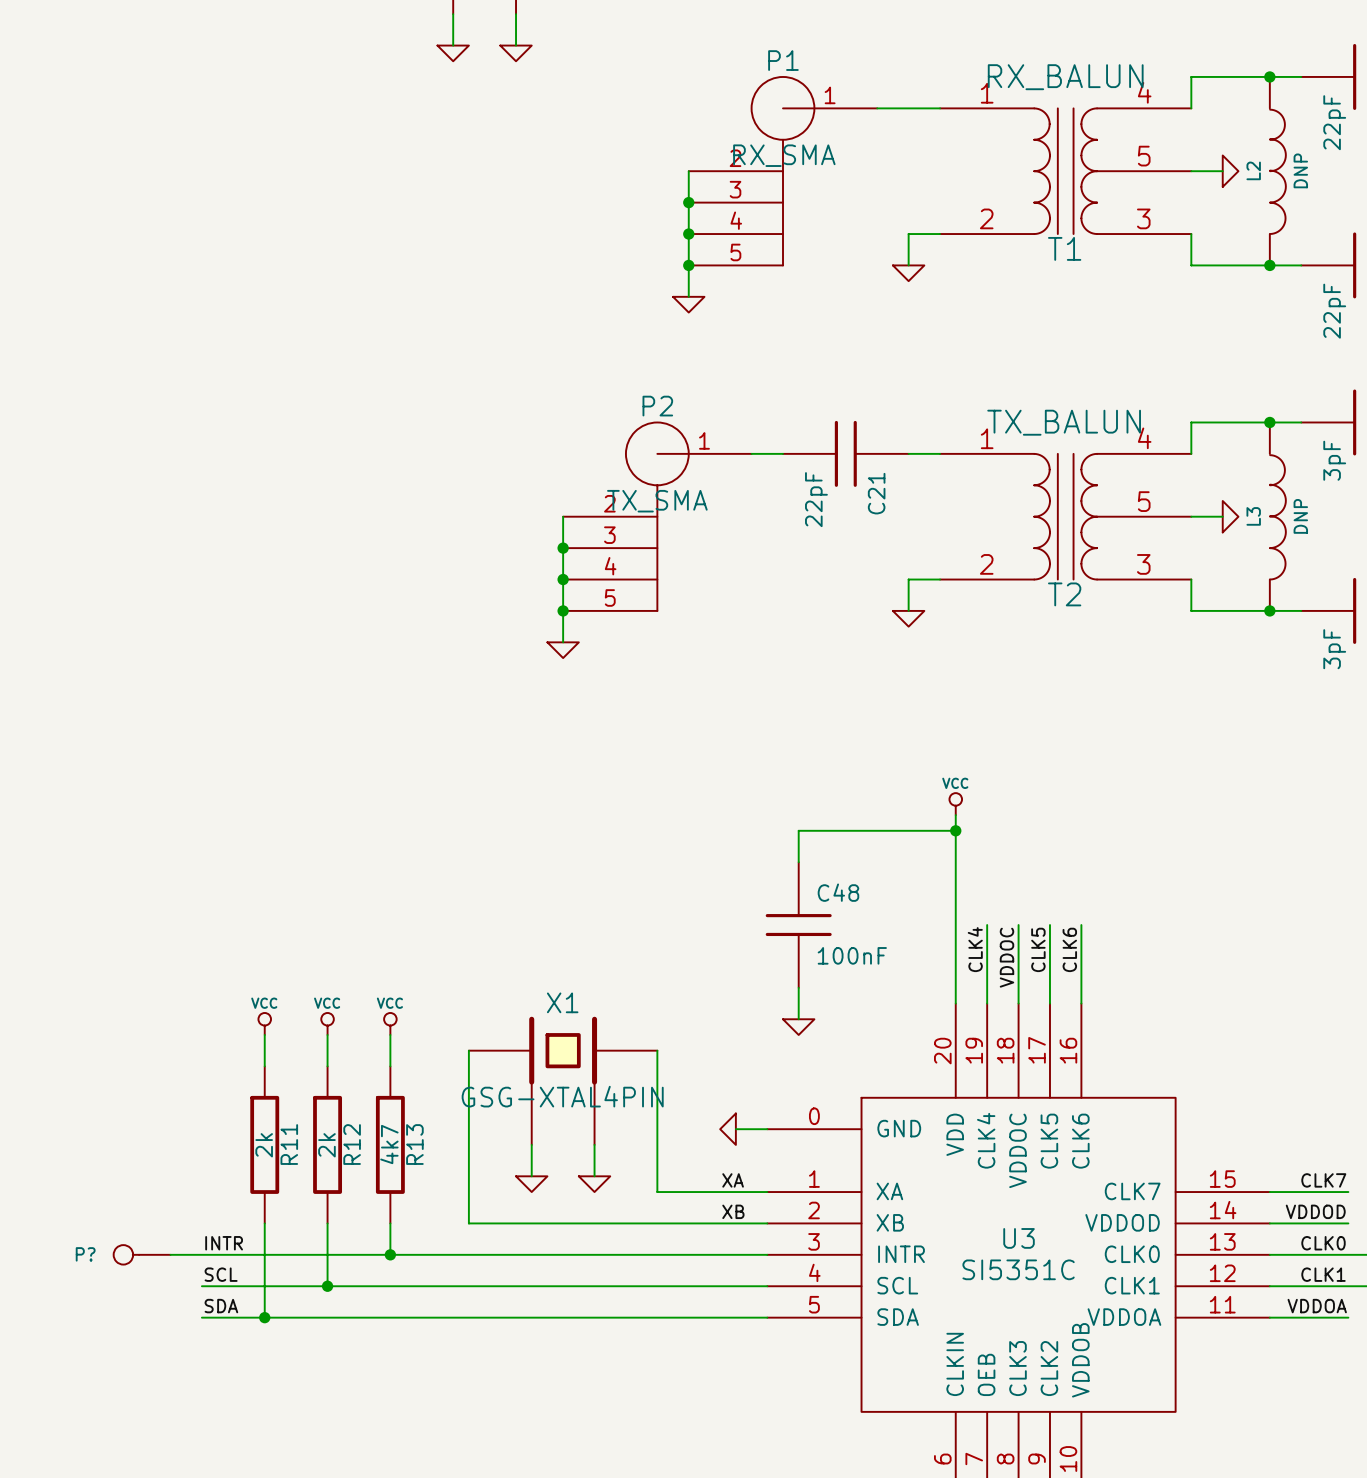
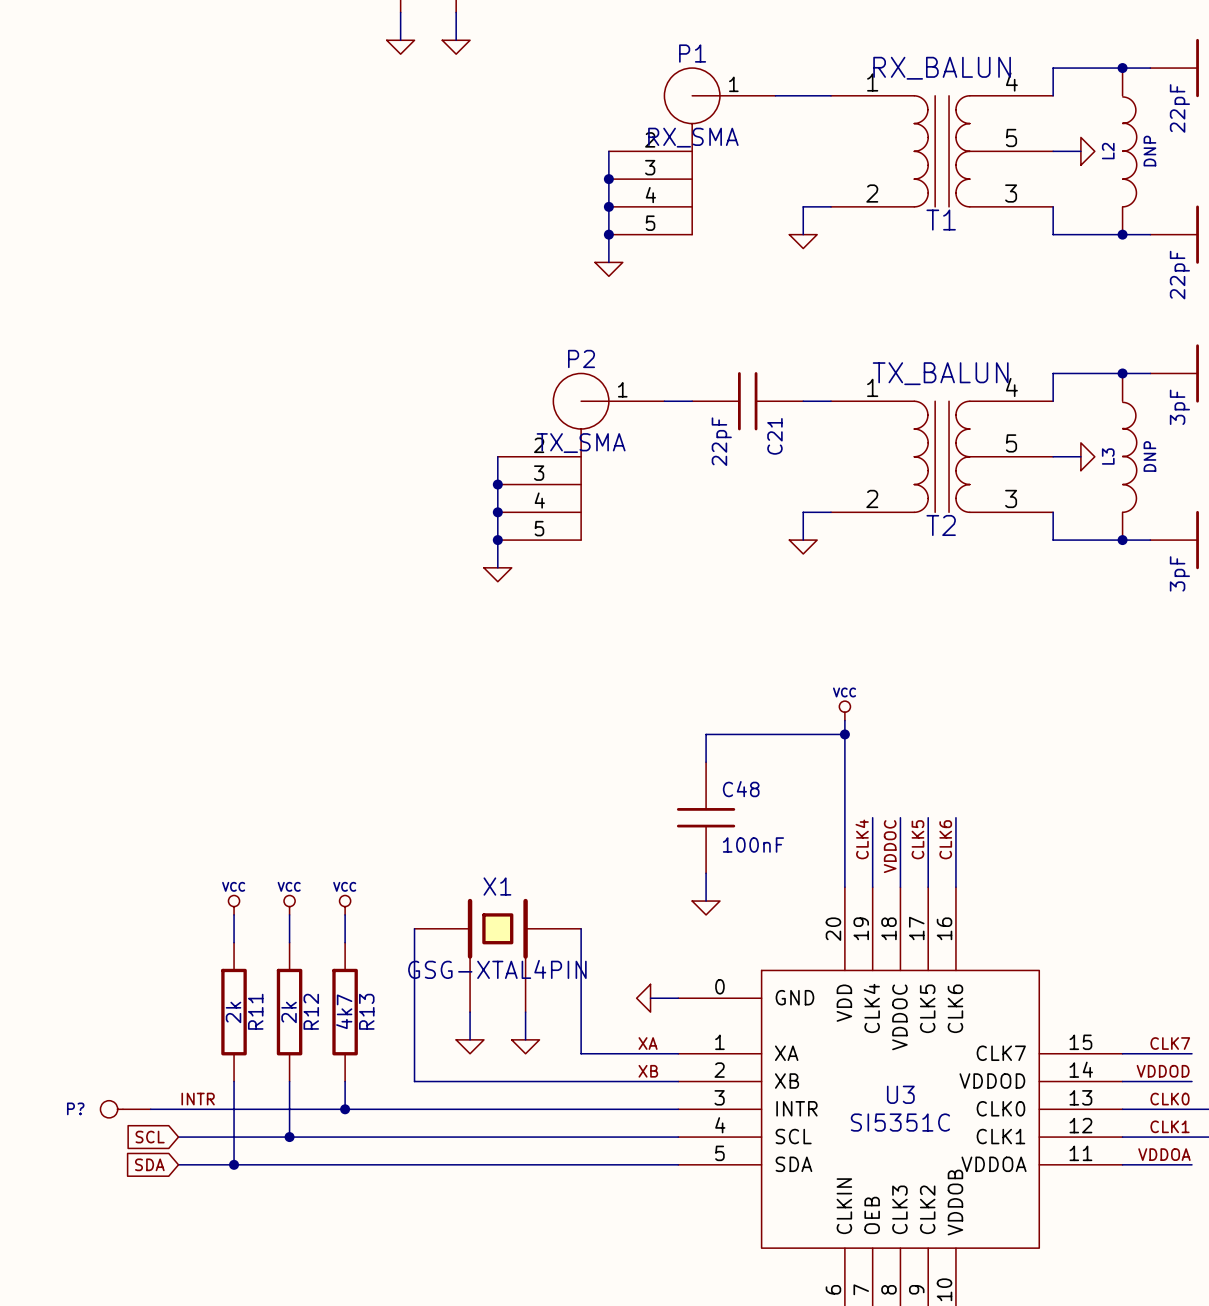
label: SCL (221, 1274) -> none
global label: none -> SCL (150, 1137)
label: SDA (221, 1306) -> none
global label: none -> SDA (149, 1164)

